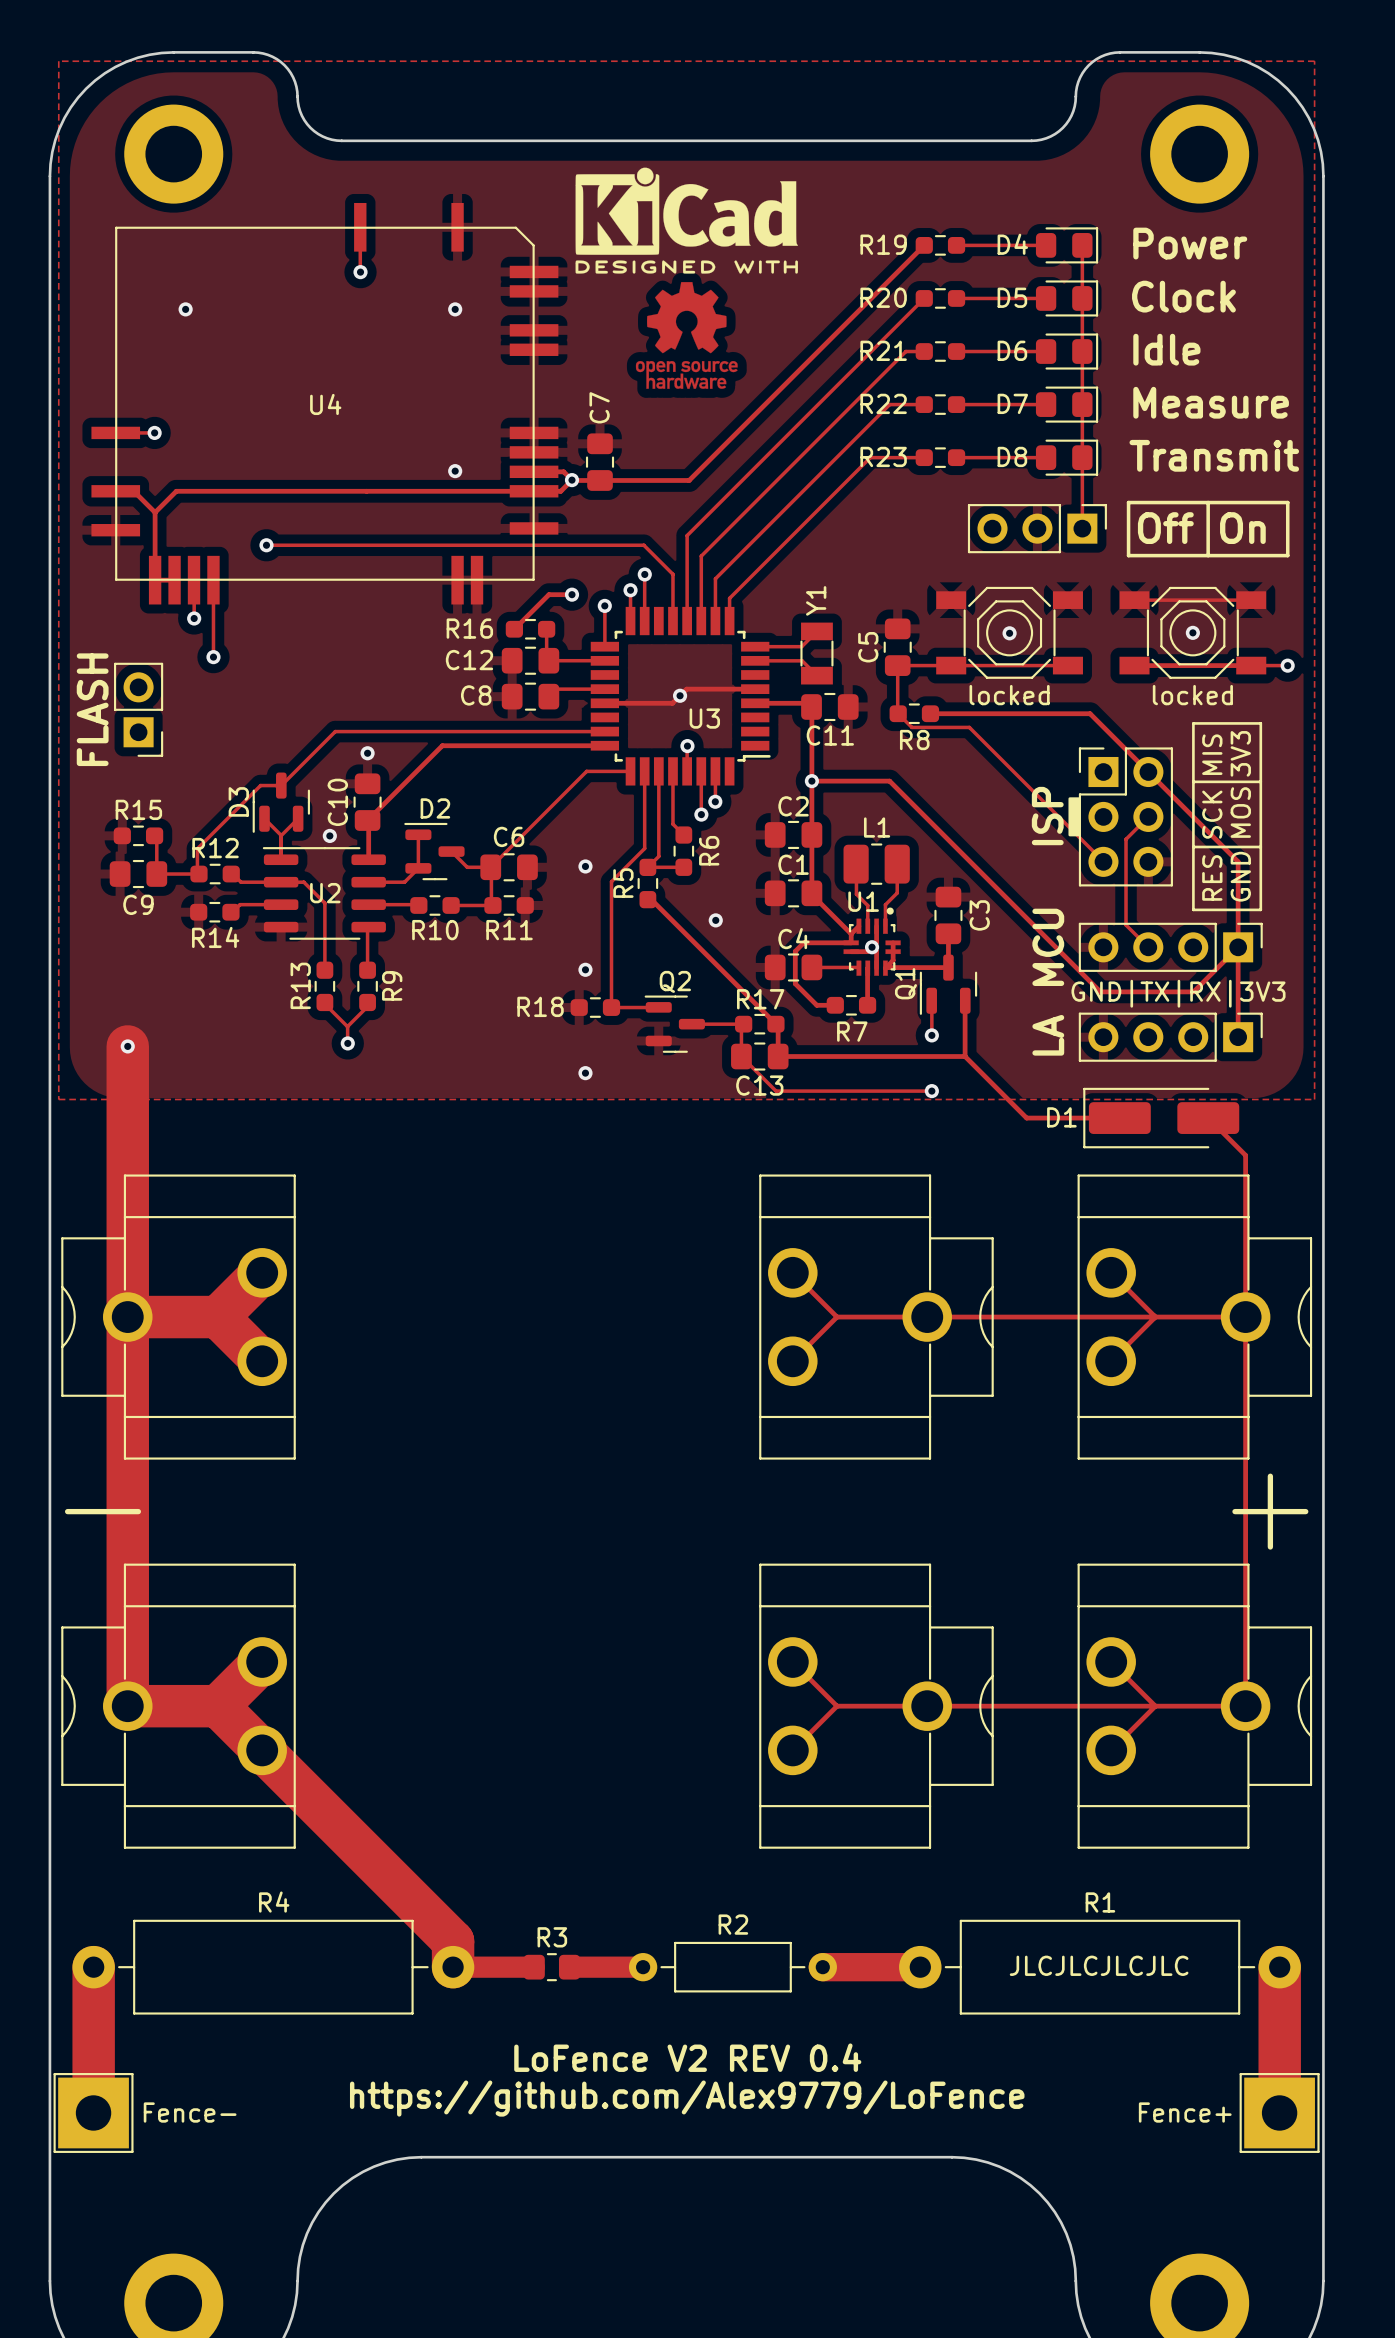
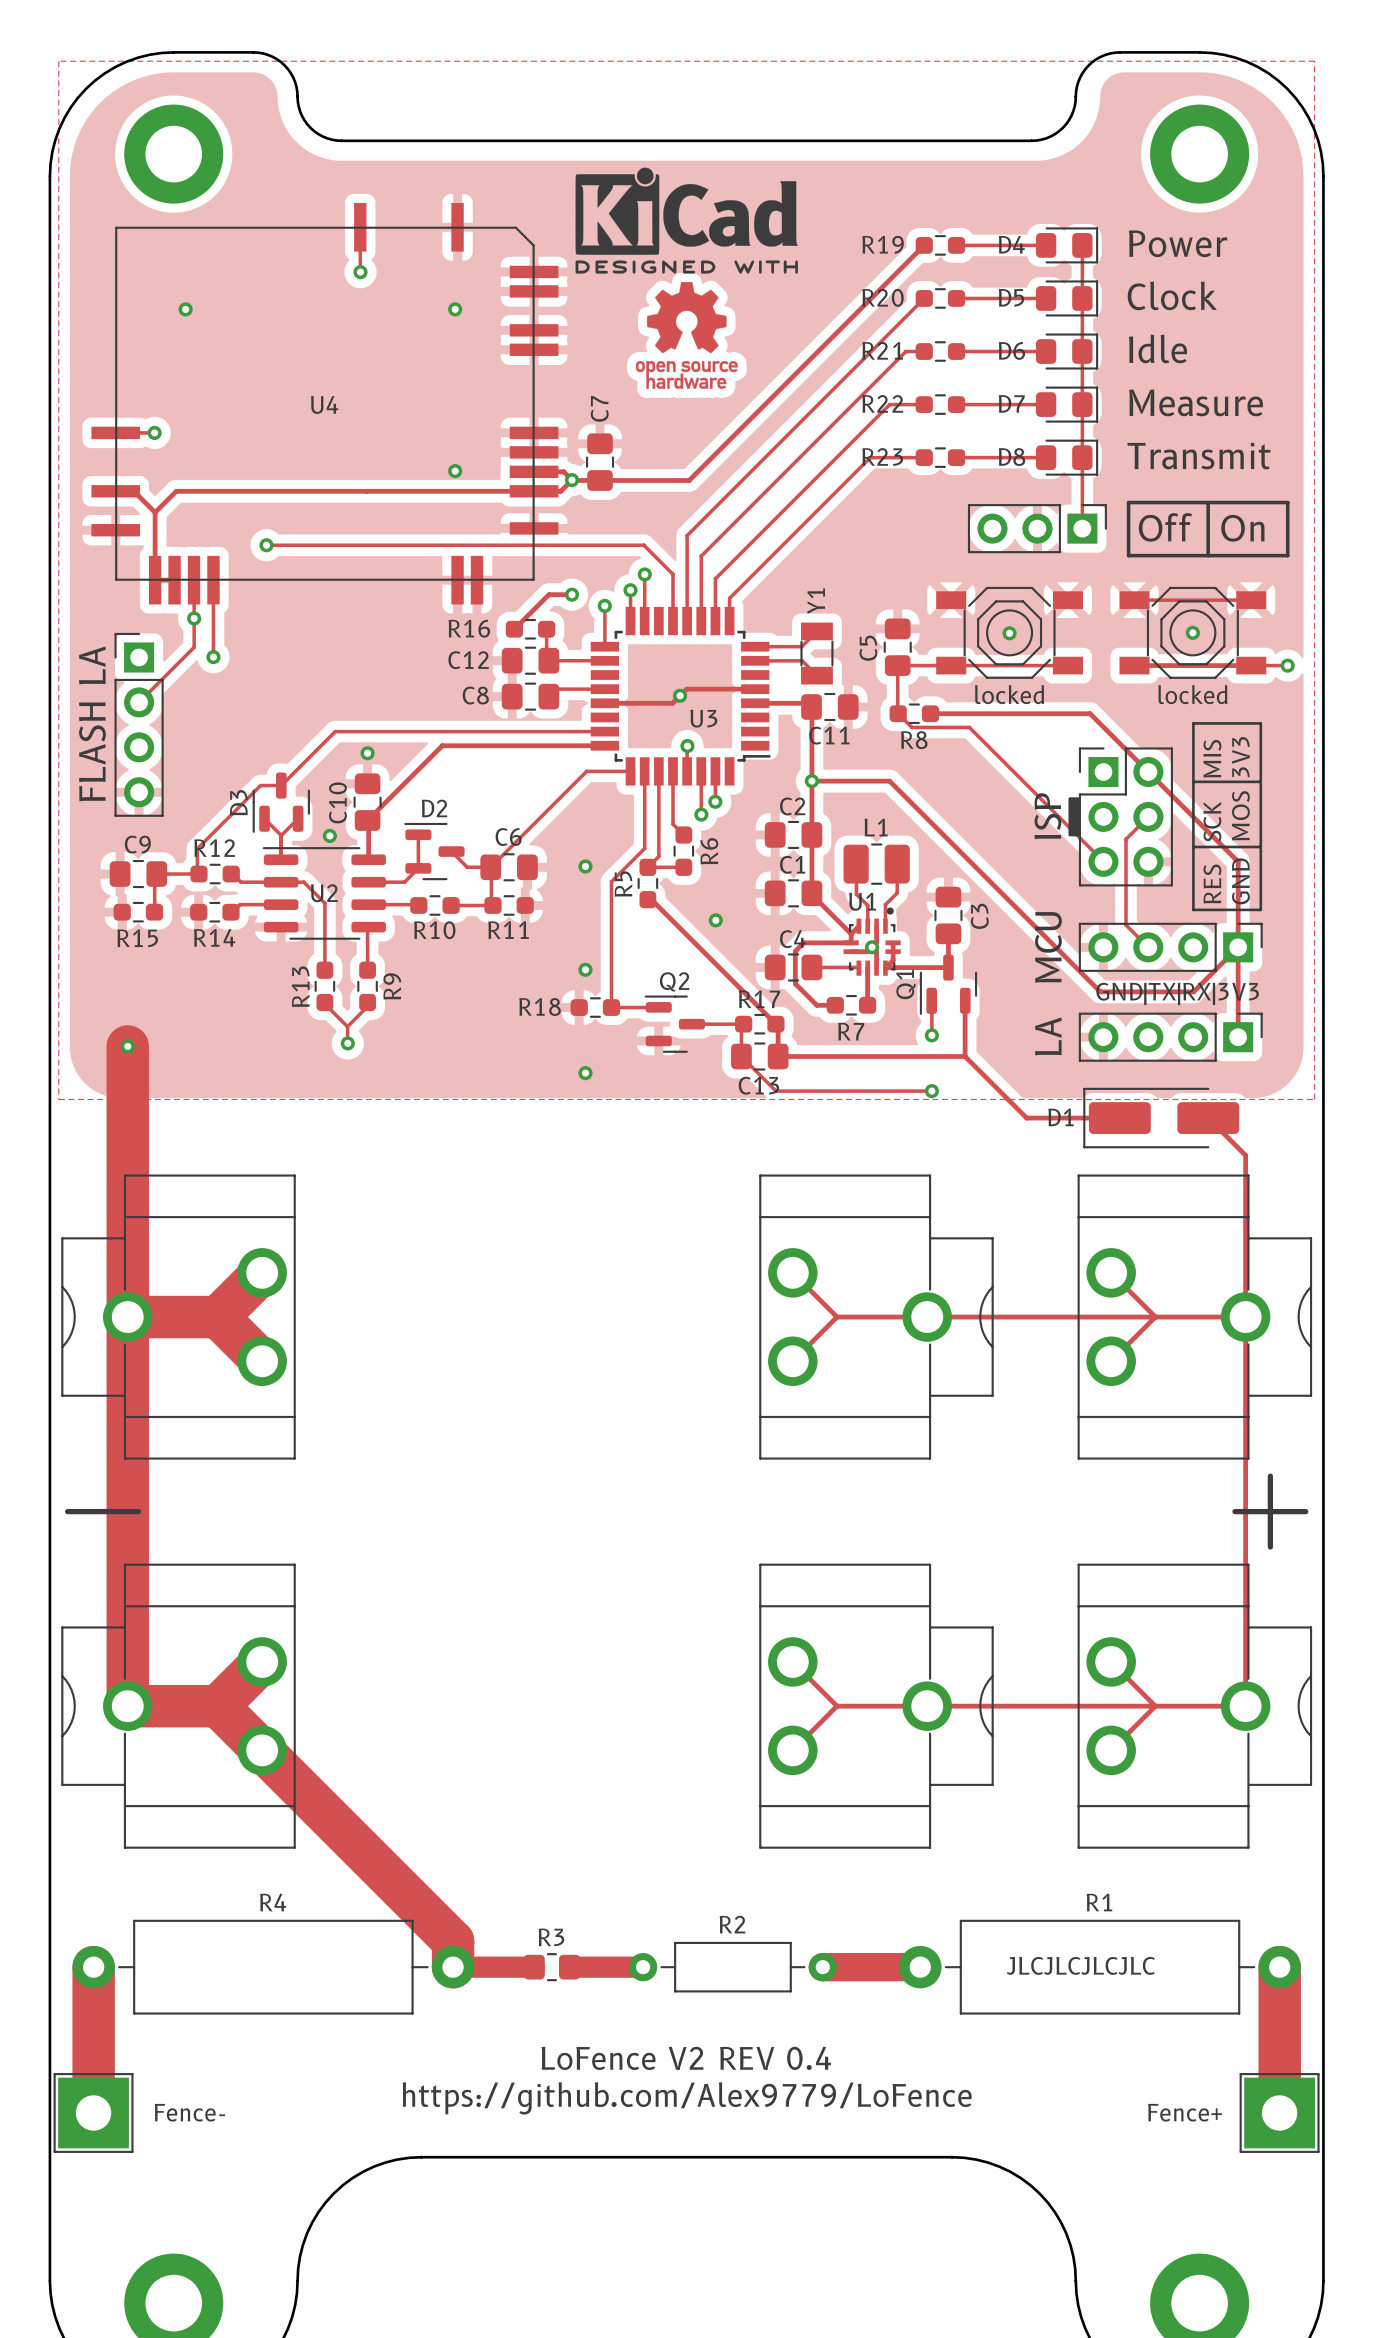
track: none -> (194, 618) (194, 647) (139, 702)
part footprint: [114, 662, 164, 757] -> [114, 632, 164, 817]
text: FLASH (92, 709) -> FLASH LA (92, 723)
R15 name position: R15 (138, 809) -> R15 (137, 938)
R15 position: (138, 835) -> (138, 912)
track: (156, 835) (156, 874) -> (154, 912) (154, 876) (156, 874)
C9 name position: C9 (138, 904) -> C9 (137, 844)

